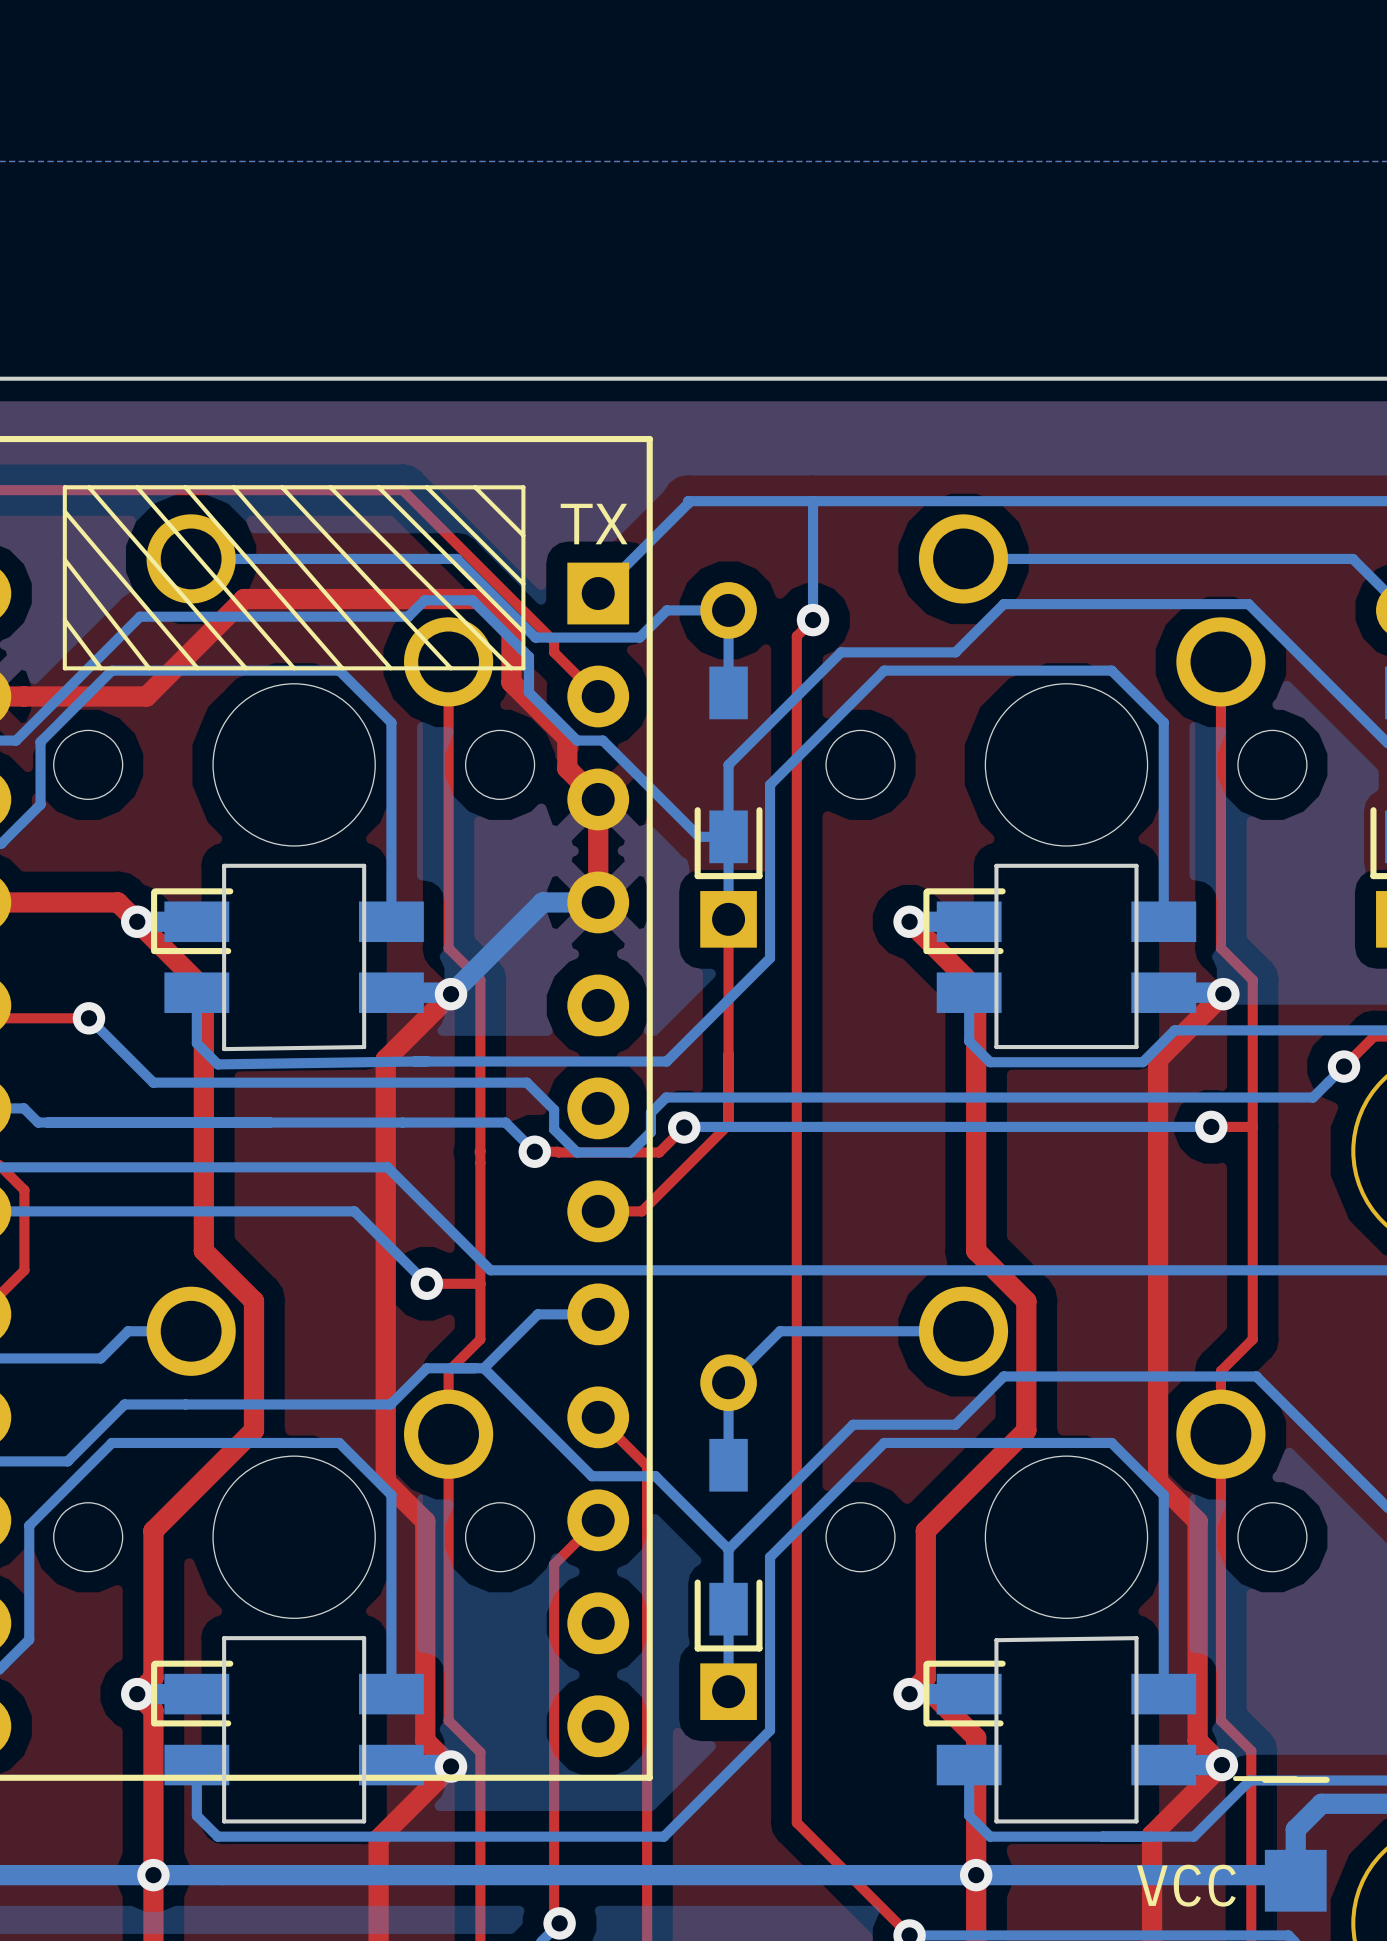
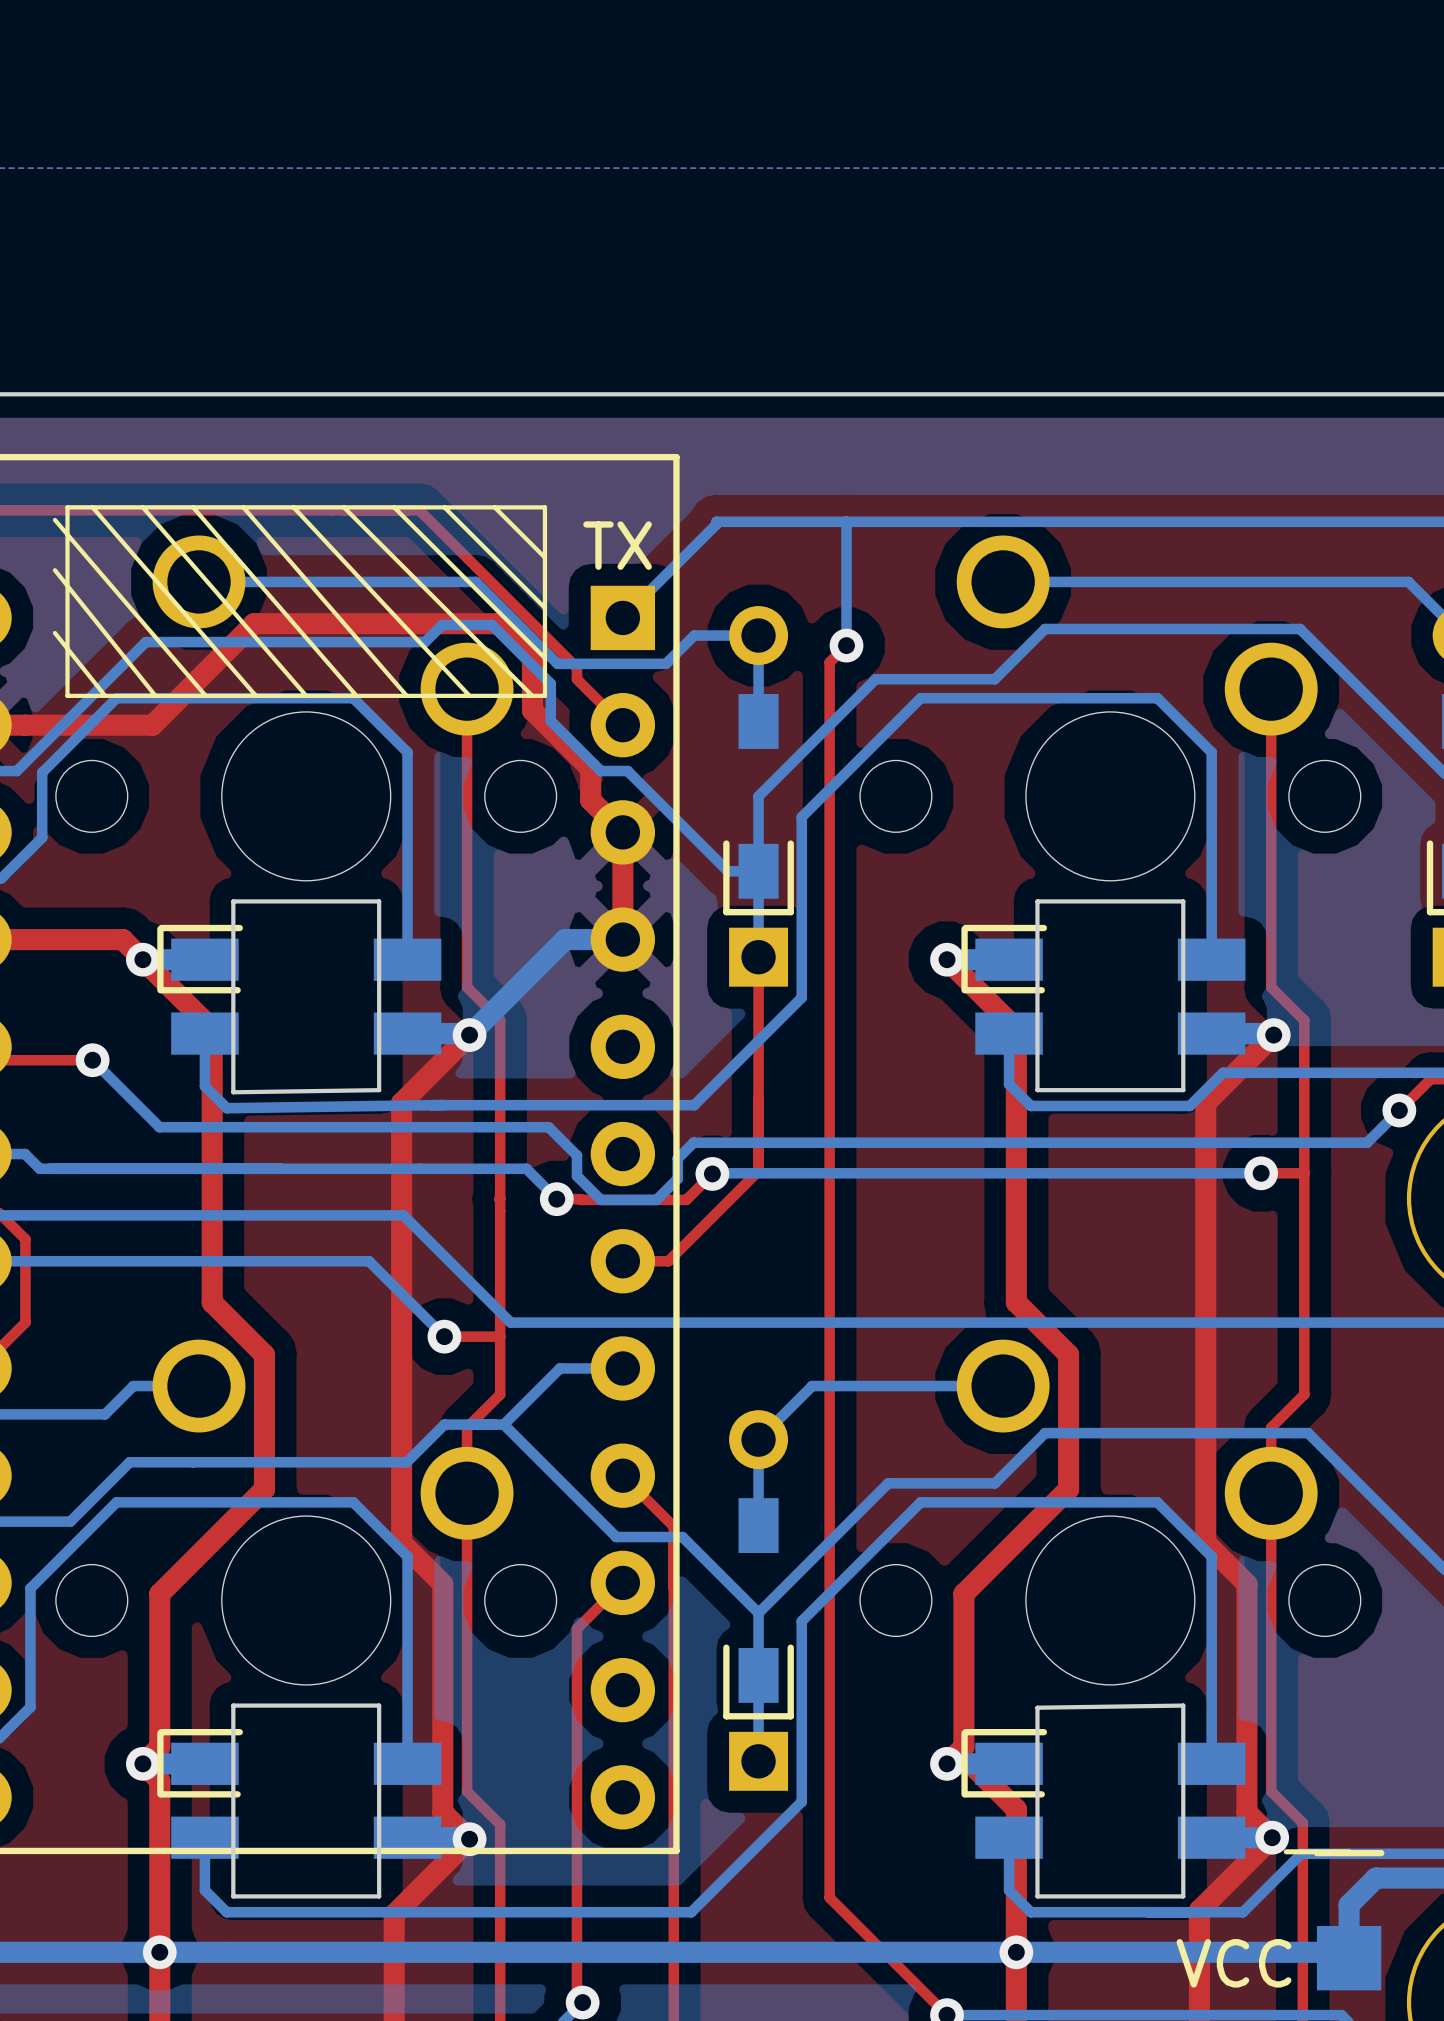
line: (64, 511) (197, 668) -> (54, 519) (205, 695)
line: (64, 559) (149, 668) -> (54, 570) (155, 695)
line: (64, 620) (101, 668) -> (54, 633) (105, 695)

